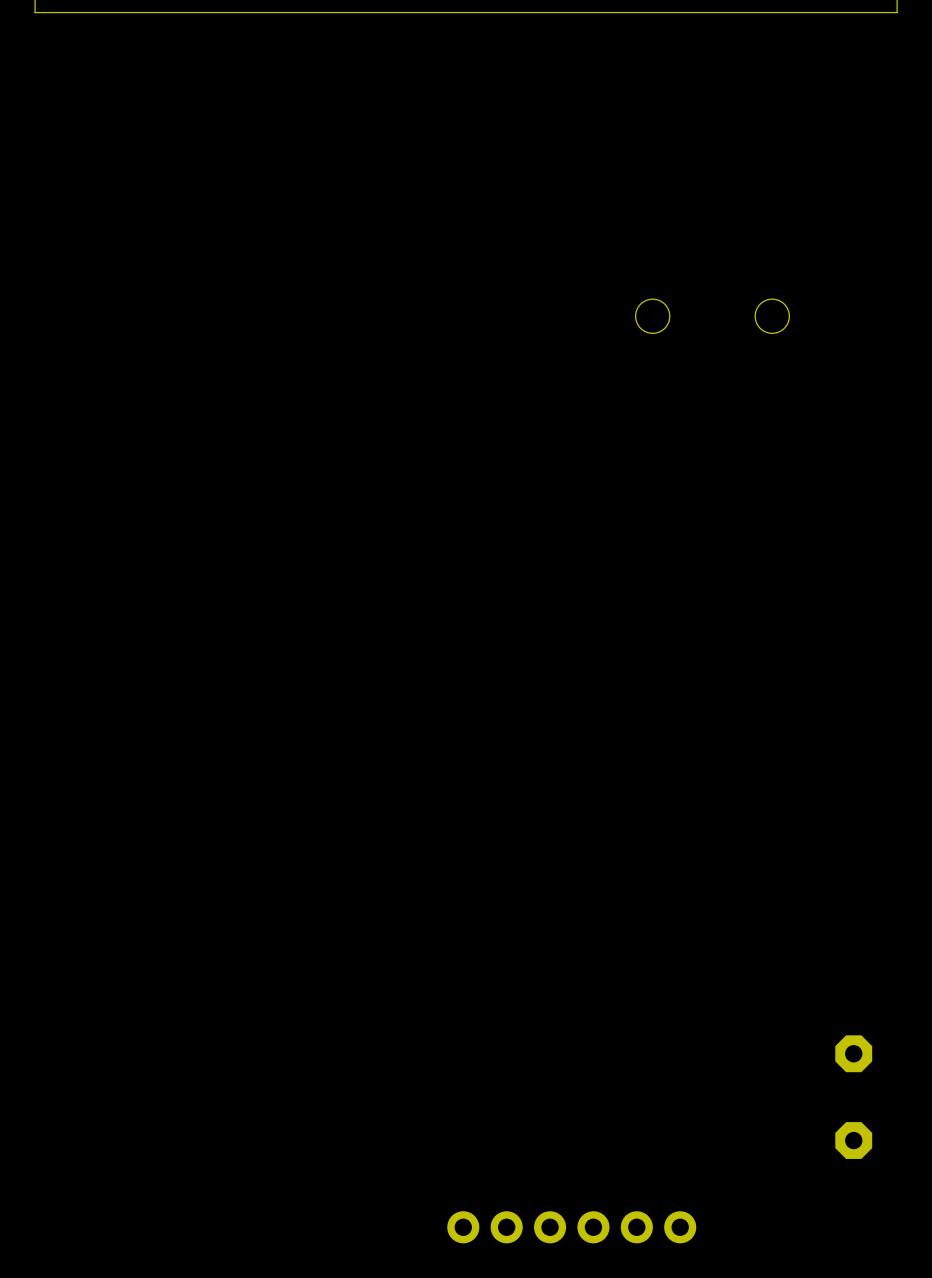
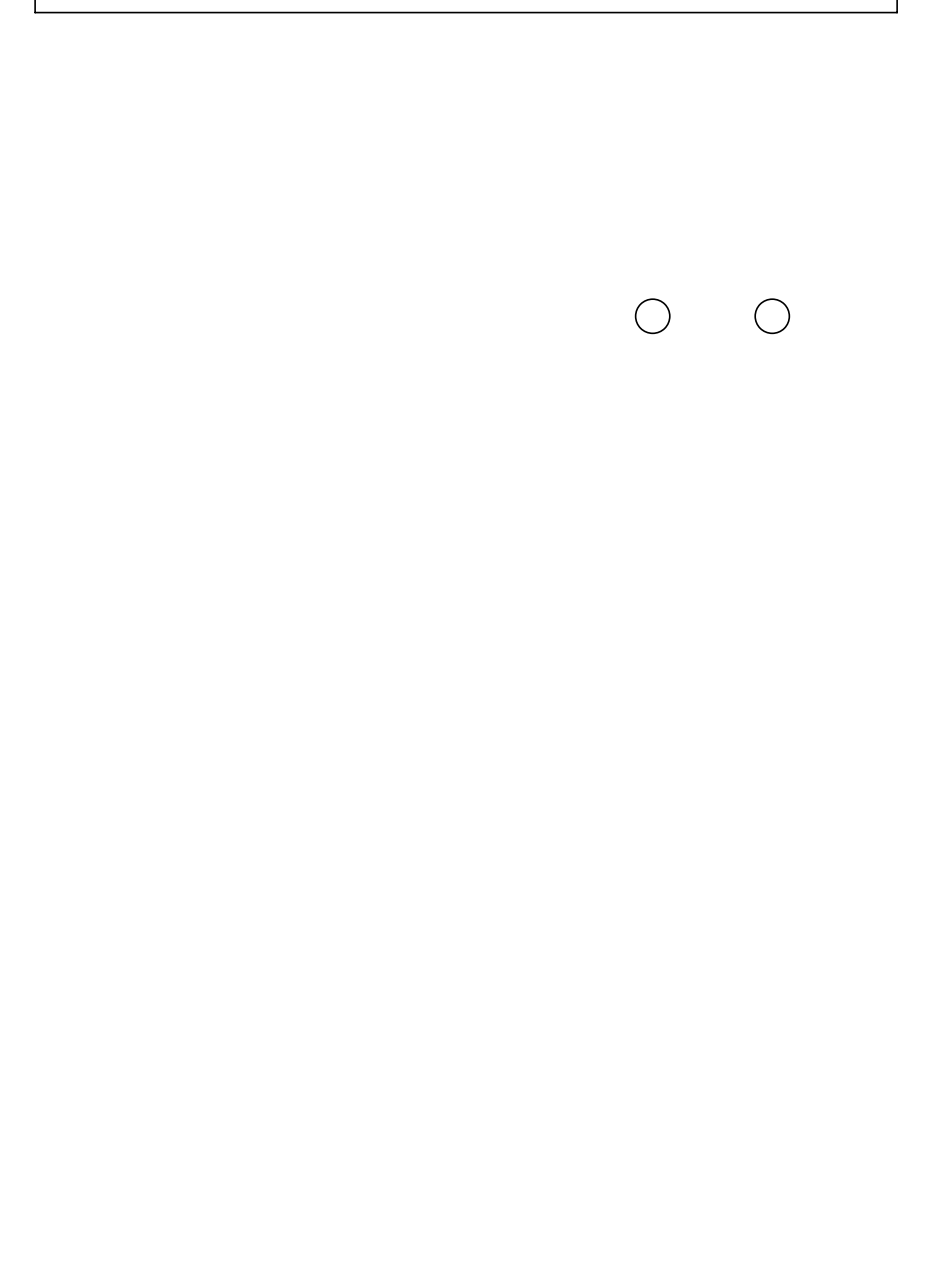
part: (853, 1053) -> none
part: (853, 1140) -> none
part: (571, 1227) -> none

